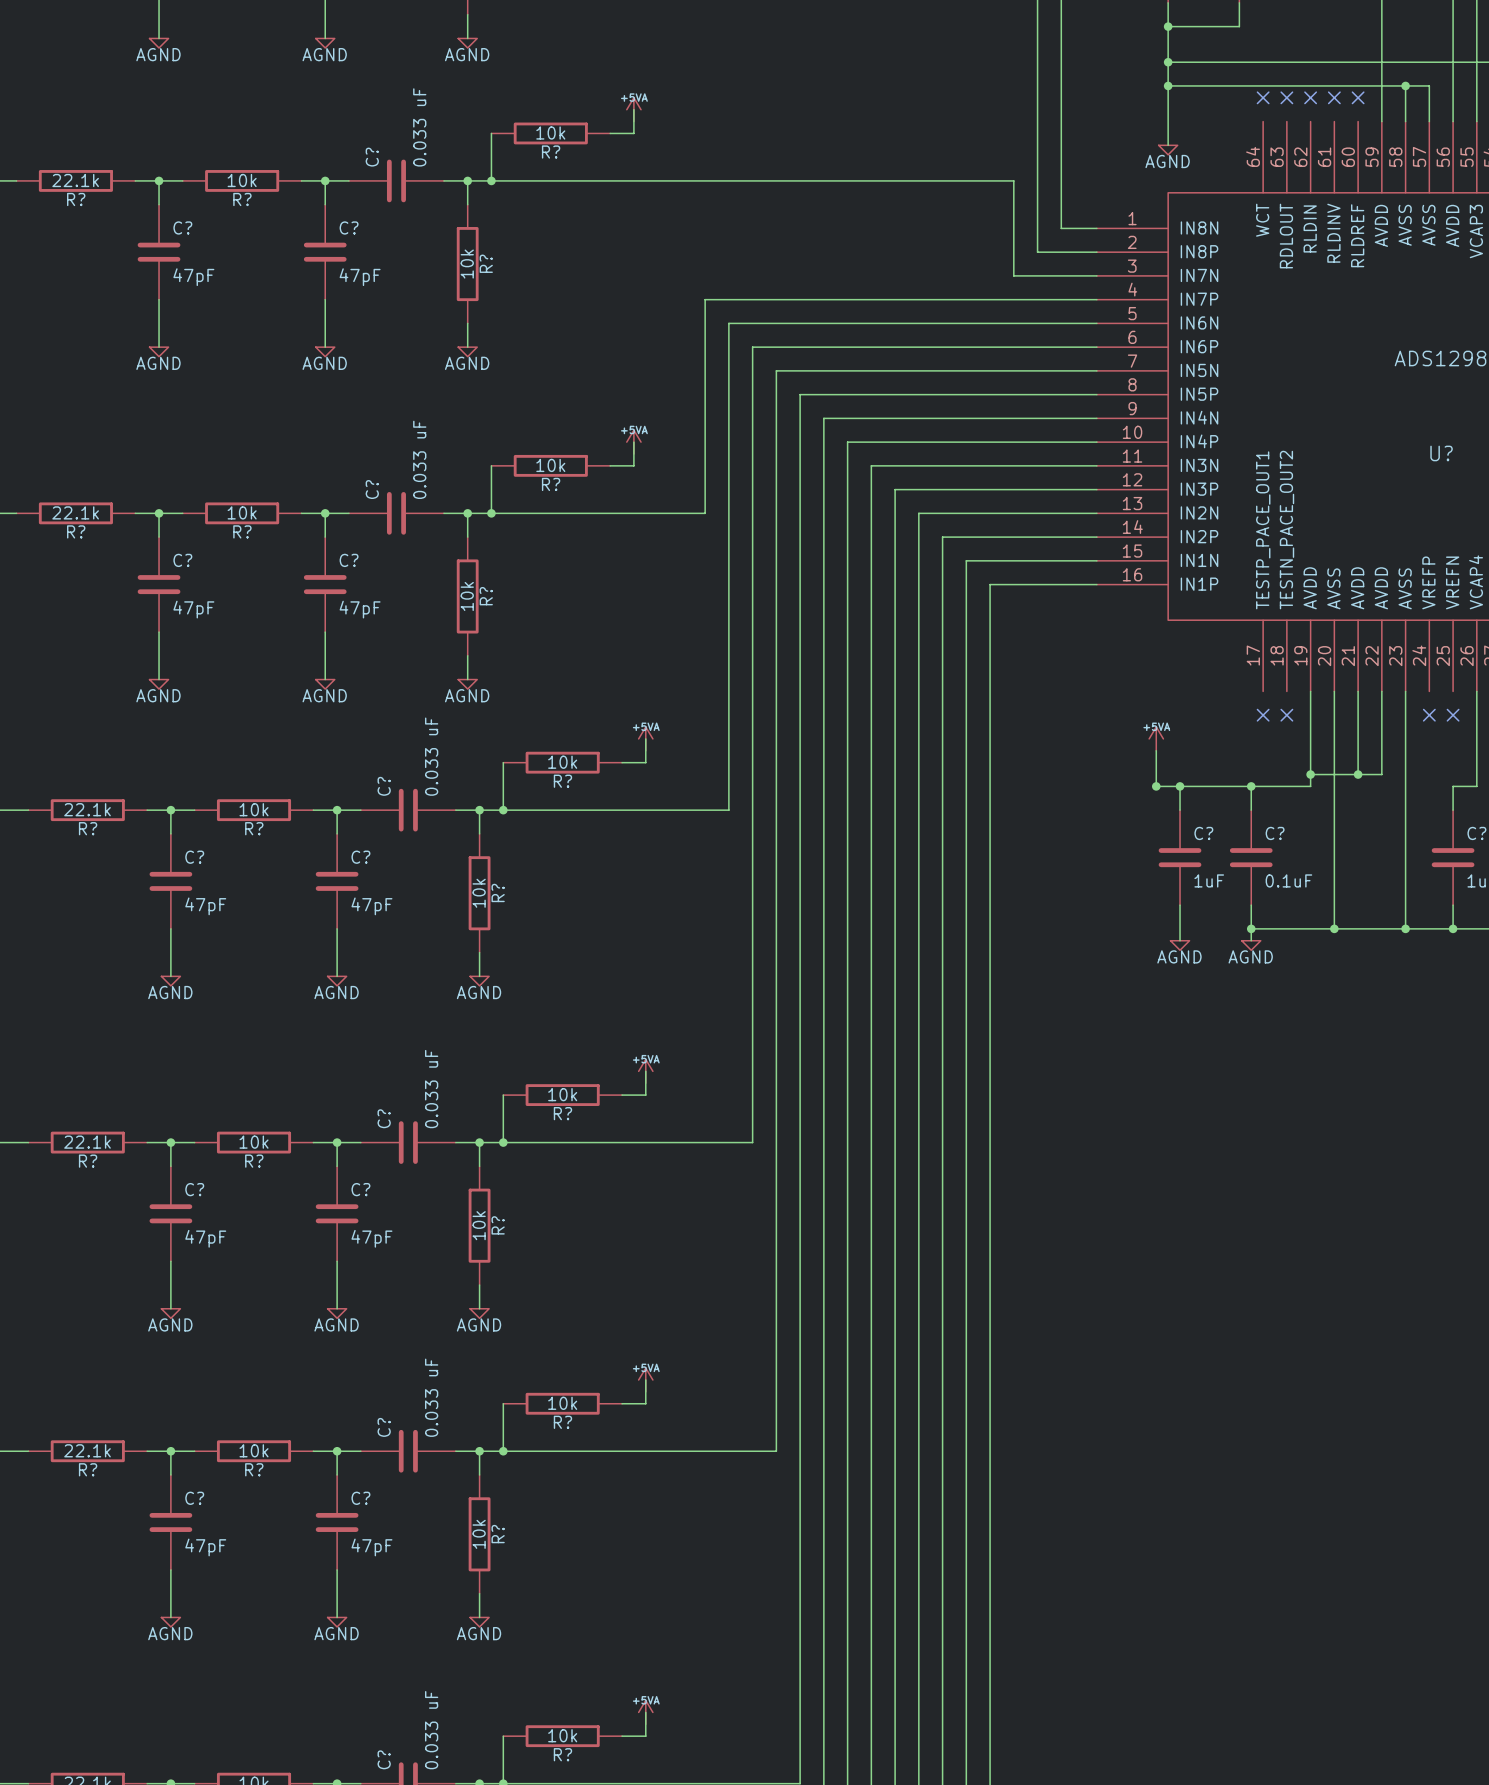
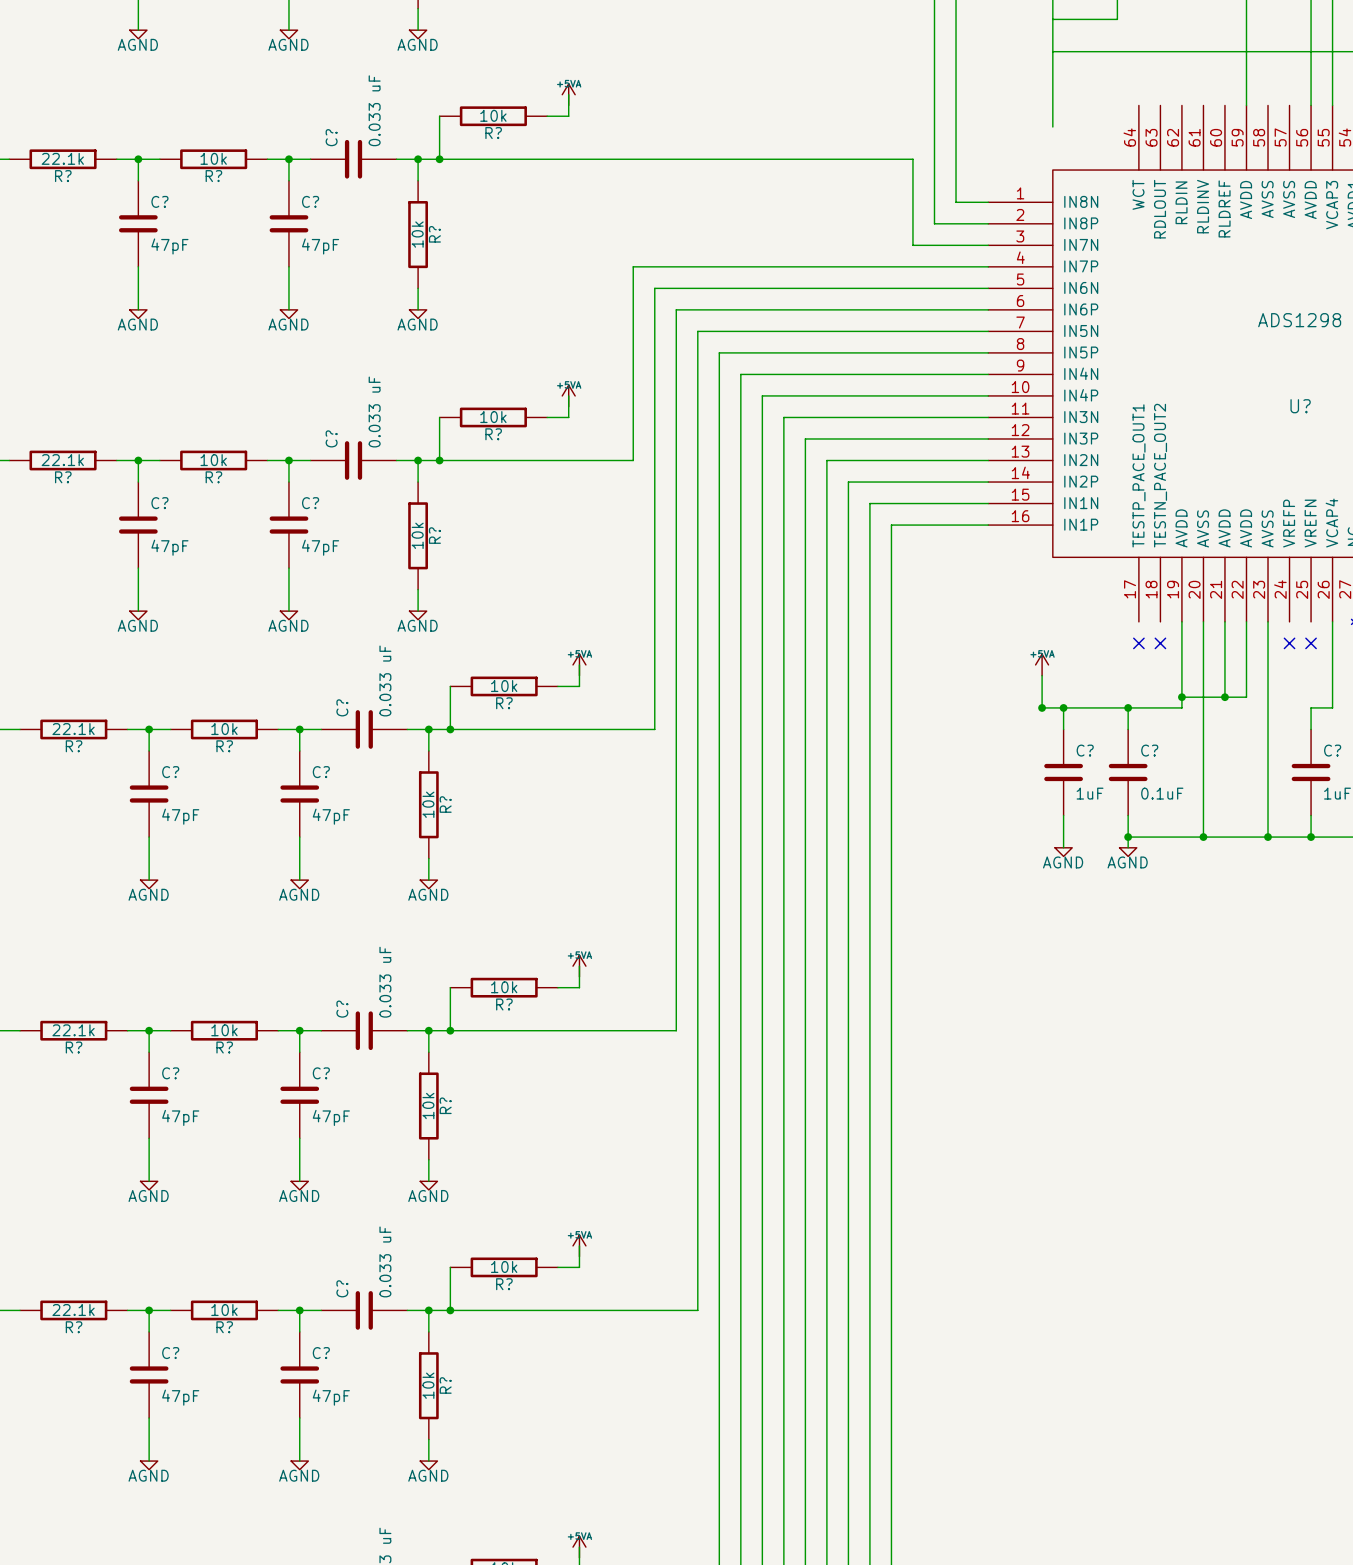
junction: (1168, 26) -> none
junction: (1168, 62) -> none
wire: (1168, 85) (1429, 85) (1429, 121) -> none
junction: (1168, 85) -> none
wire: (1405, 85) (1405, 121) -> none
junction: (1405, 85) -> none
no-connect mark: (1263, 97) -> none
no-connect mark: (1286, 97) -> none
no-connect mark: (1310, 97) -> none
no-connect mark: (1334, 97) -> none
no-connect mark: (1358, 97) -> none
power symbol: AGND (1168, 150) -> none

